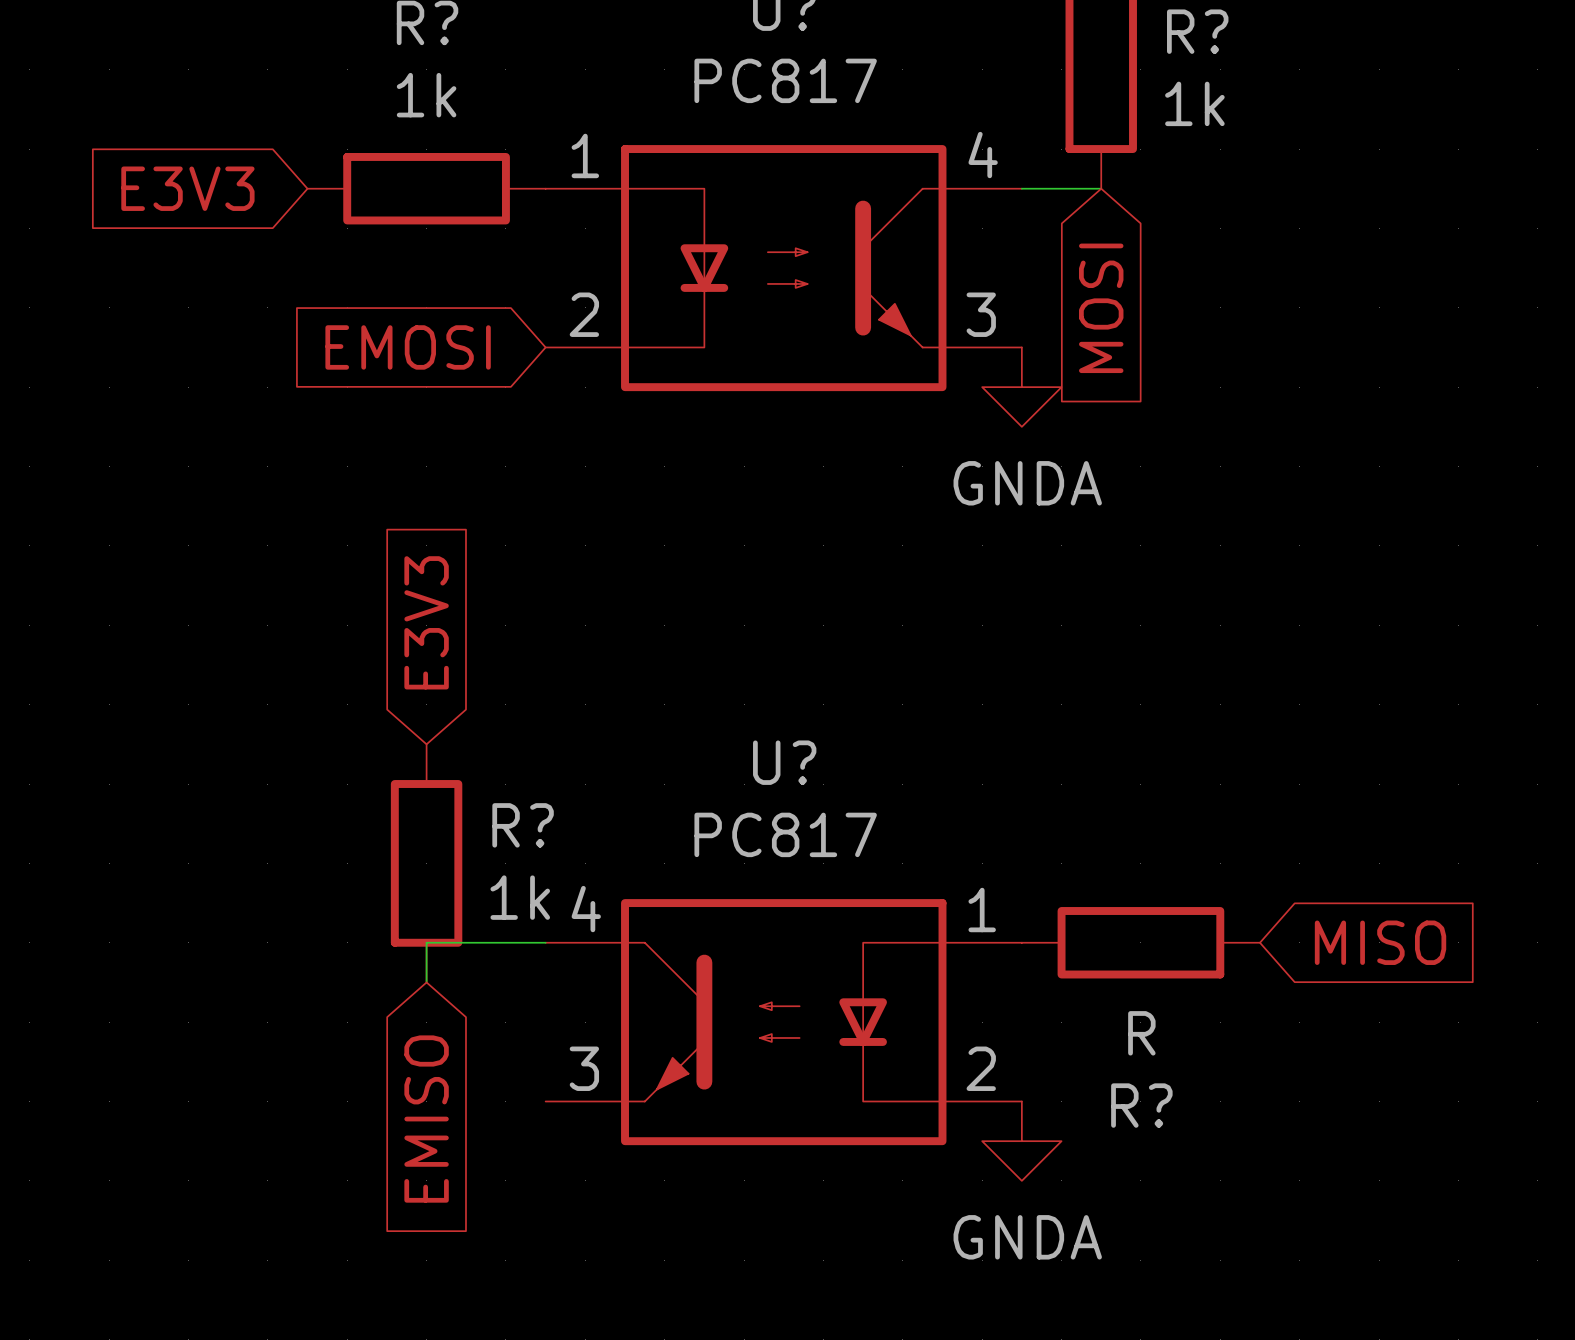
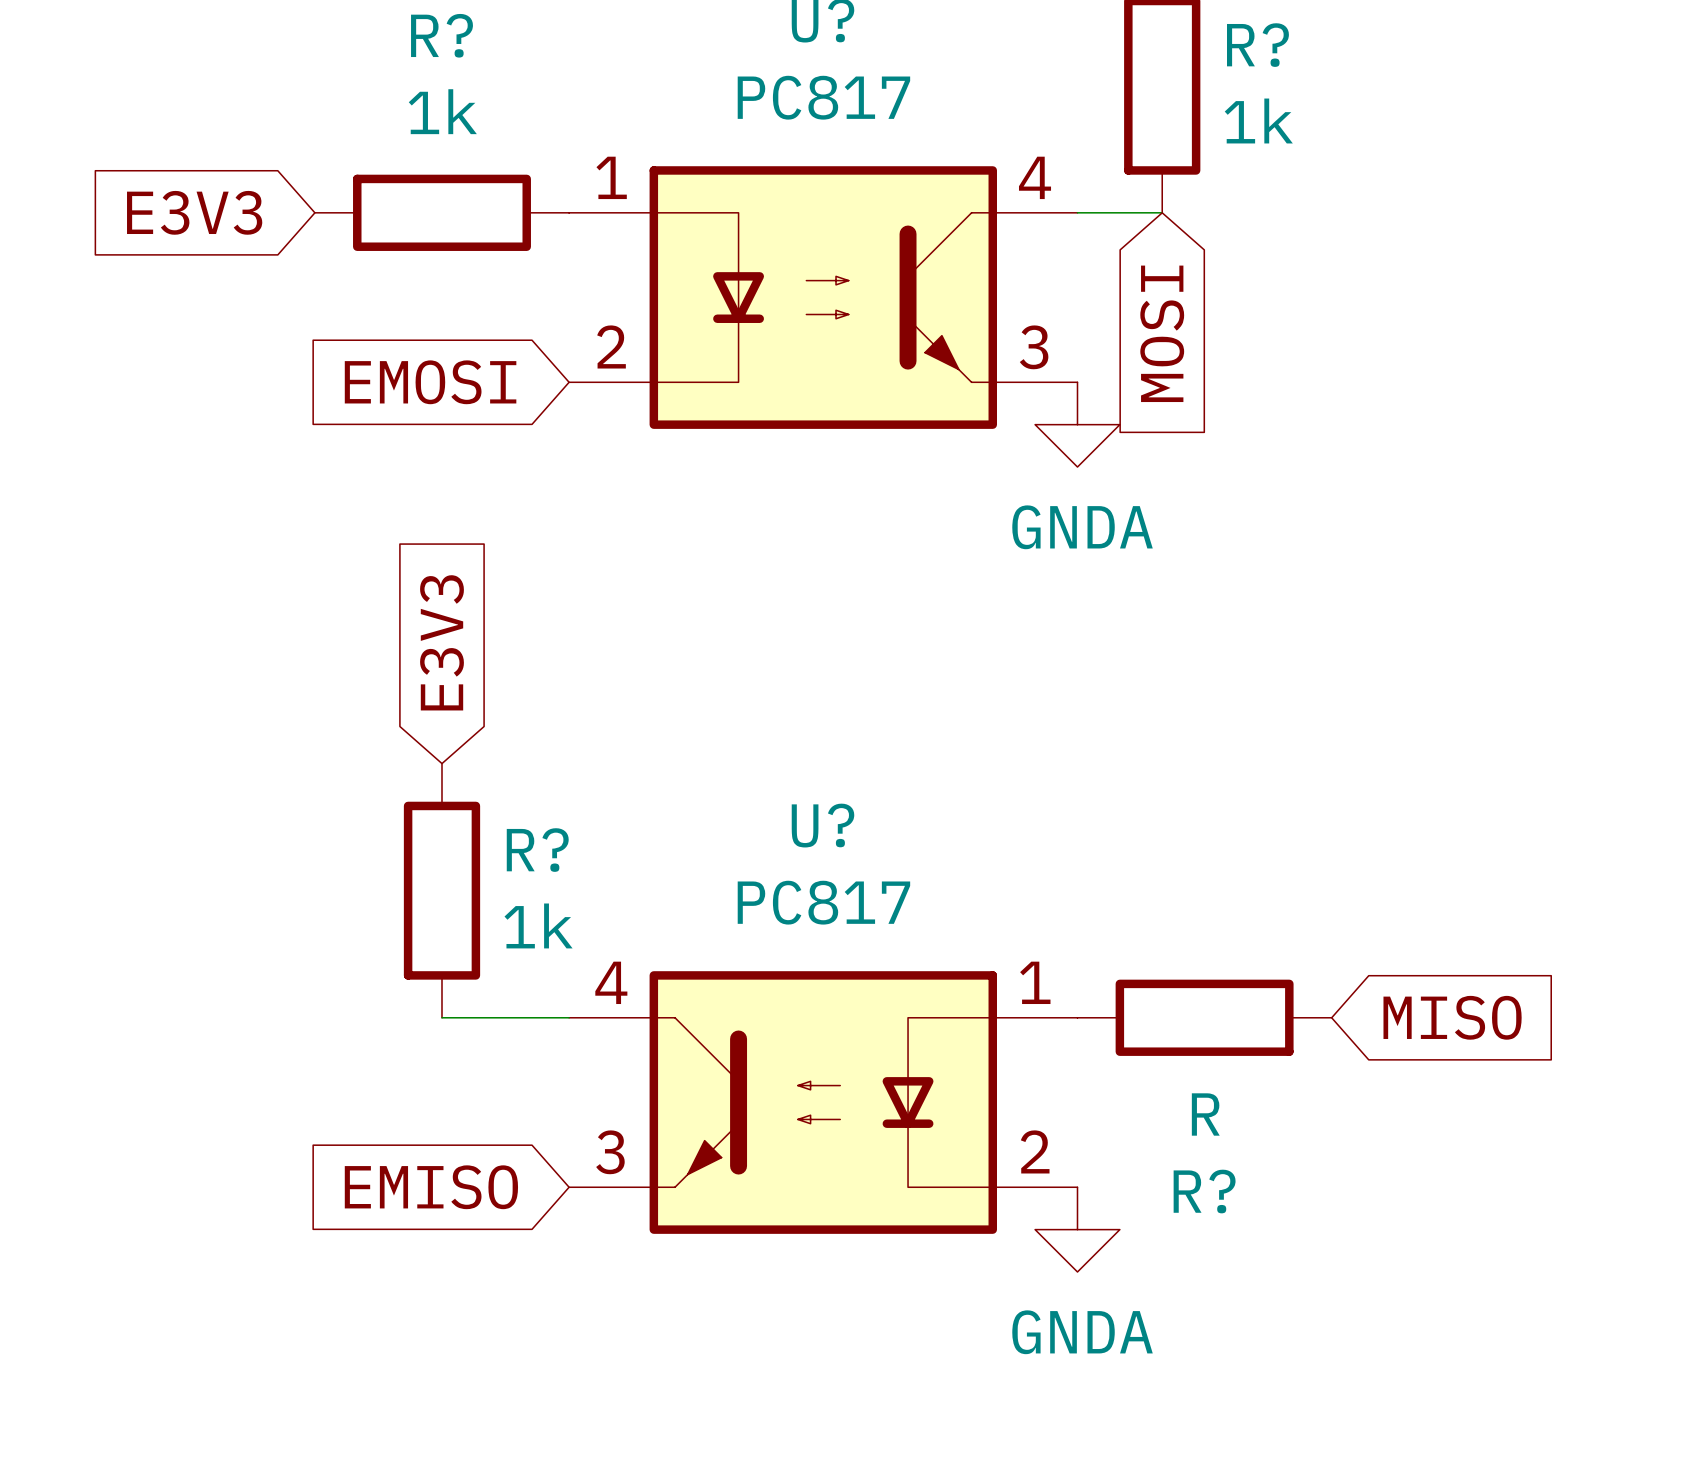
global label position: E3V3 (426, 622) -> E3V3 (441, 642)
R? position: (426, 863) -> (441, 890)
wire: (426, 942) (426, 982) -> none
global label rotation: 0° (426, 1119) -> 90° clockwise (431, 1187)

